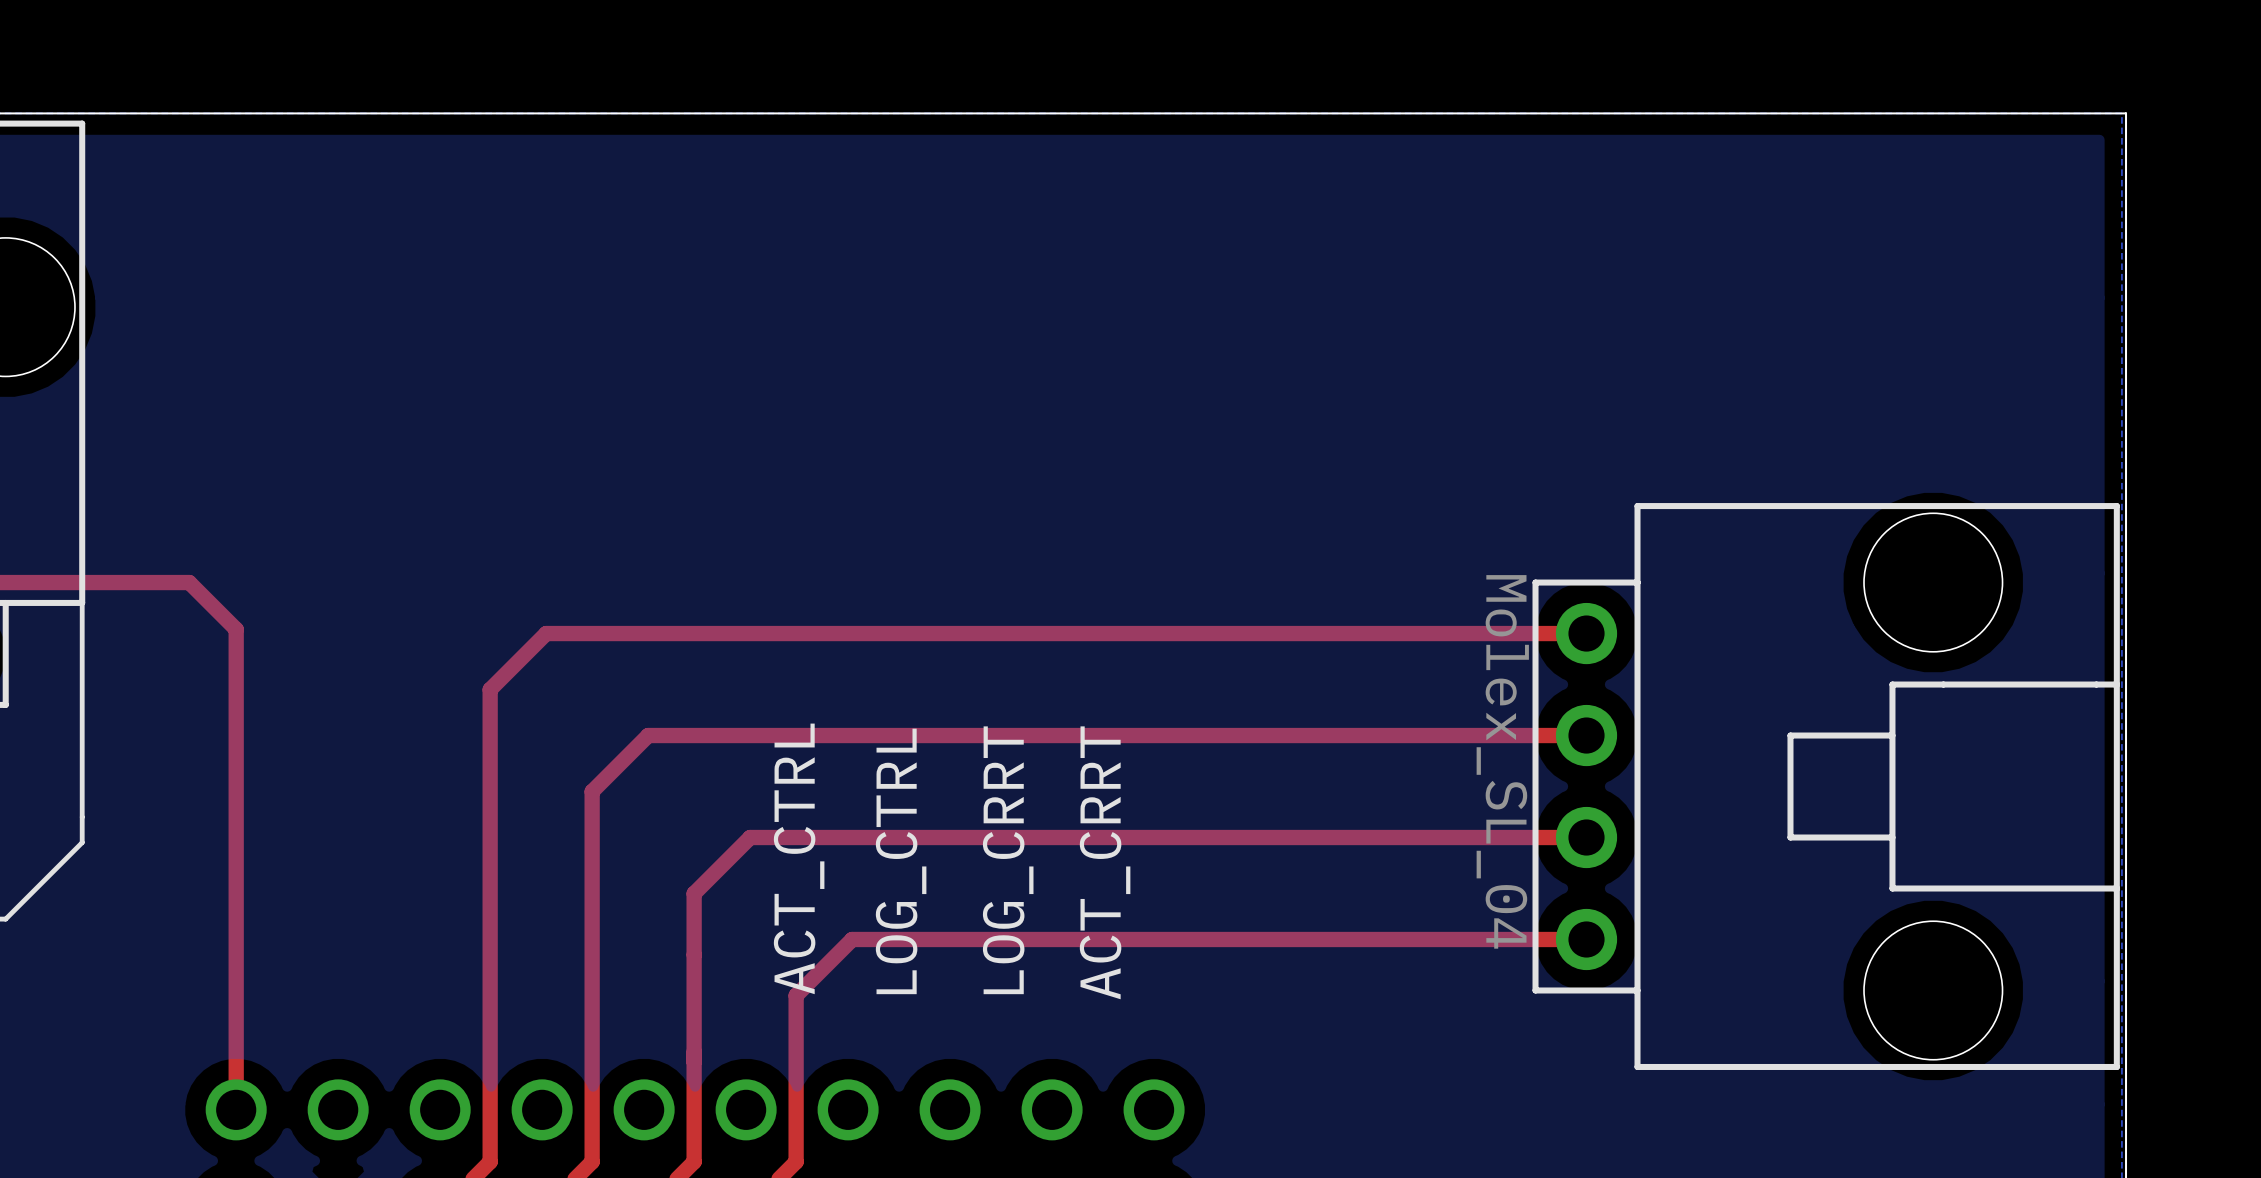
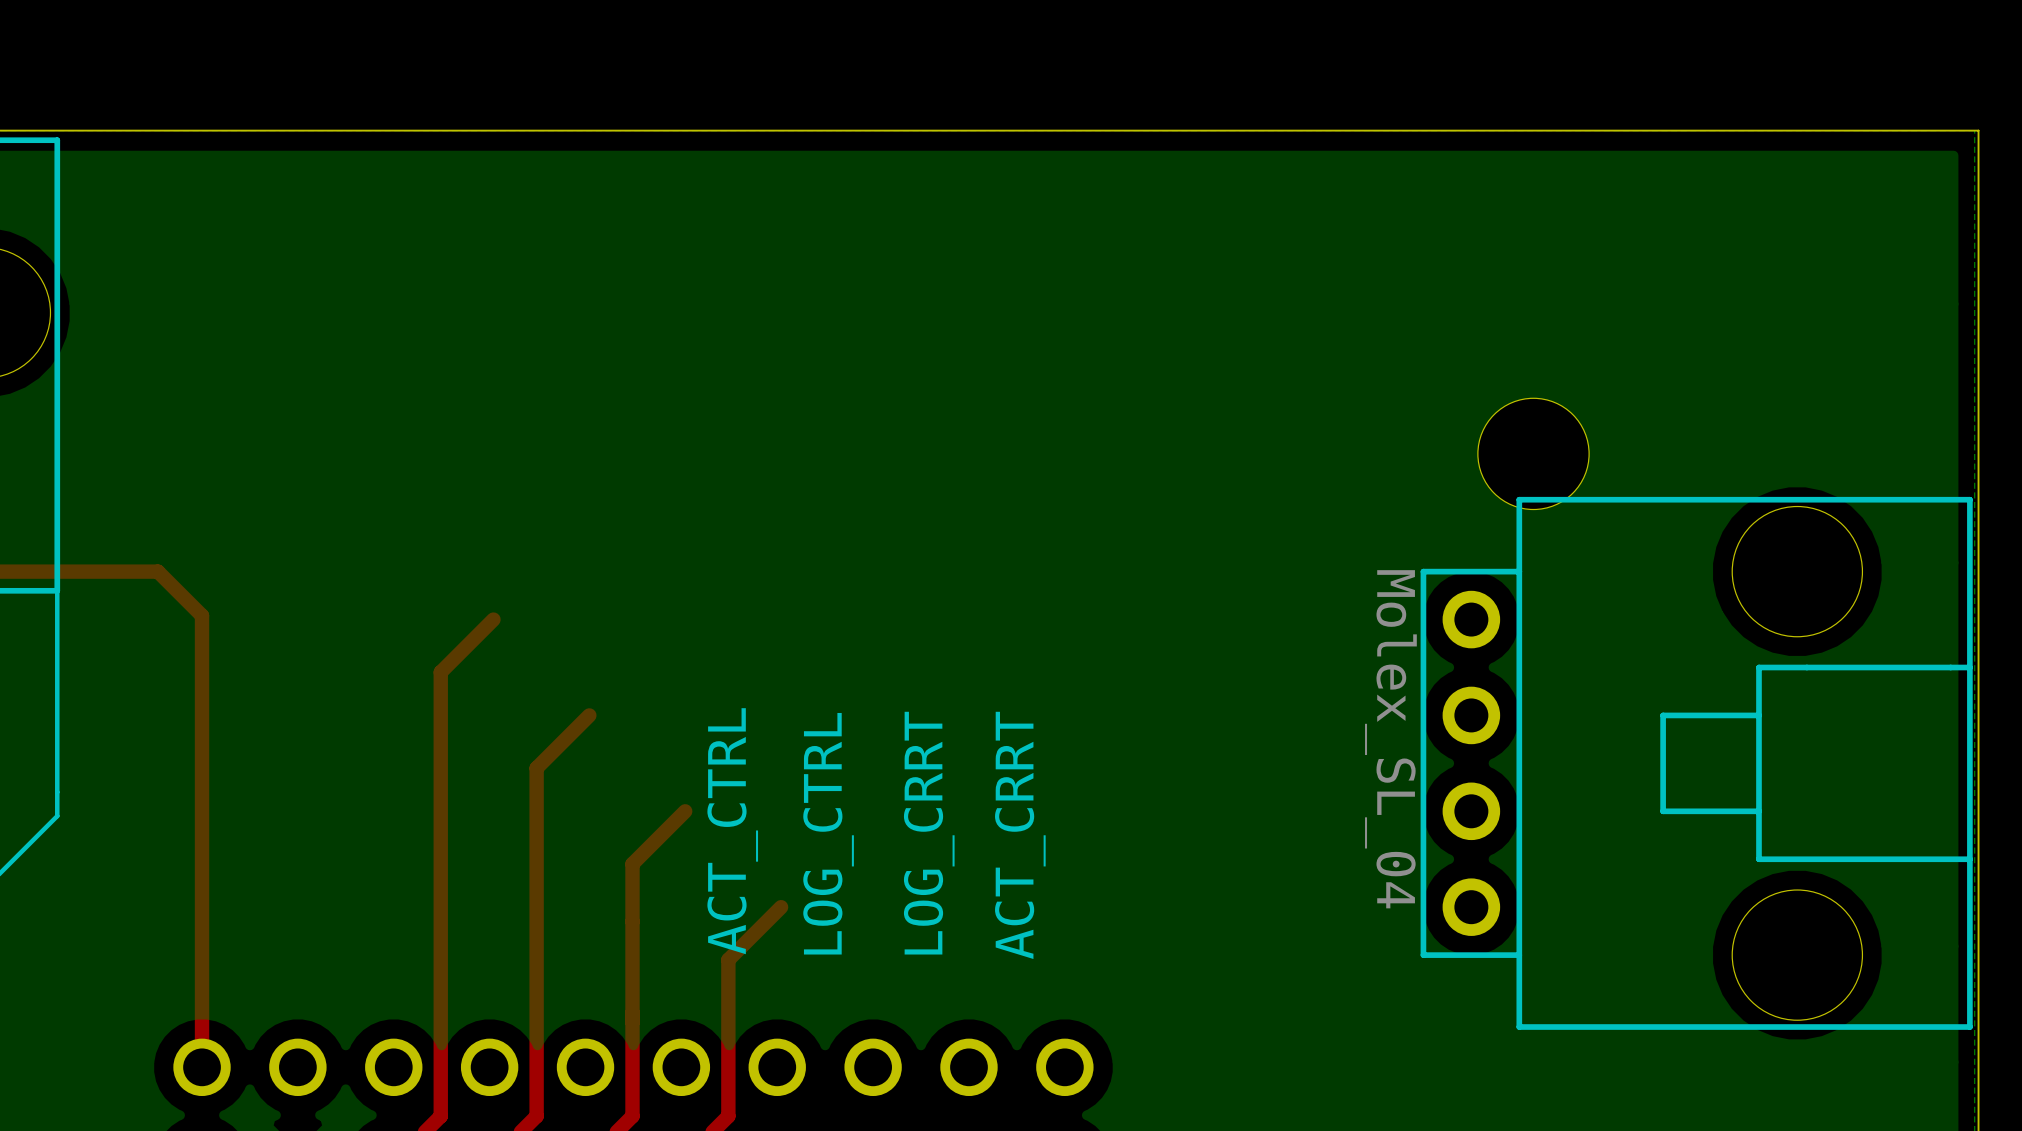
part: none -> (1533, 453)
top track: (1586, 633) (546, 633) -> none
top track: (1586, 735) (648, 735) -> none
top track: (1586, 837) (750, 837) -> none
top track: (1586, 939) (852, 939) -> none

